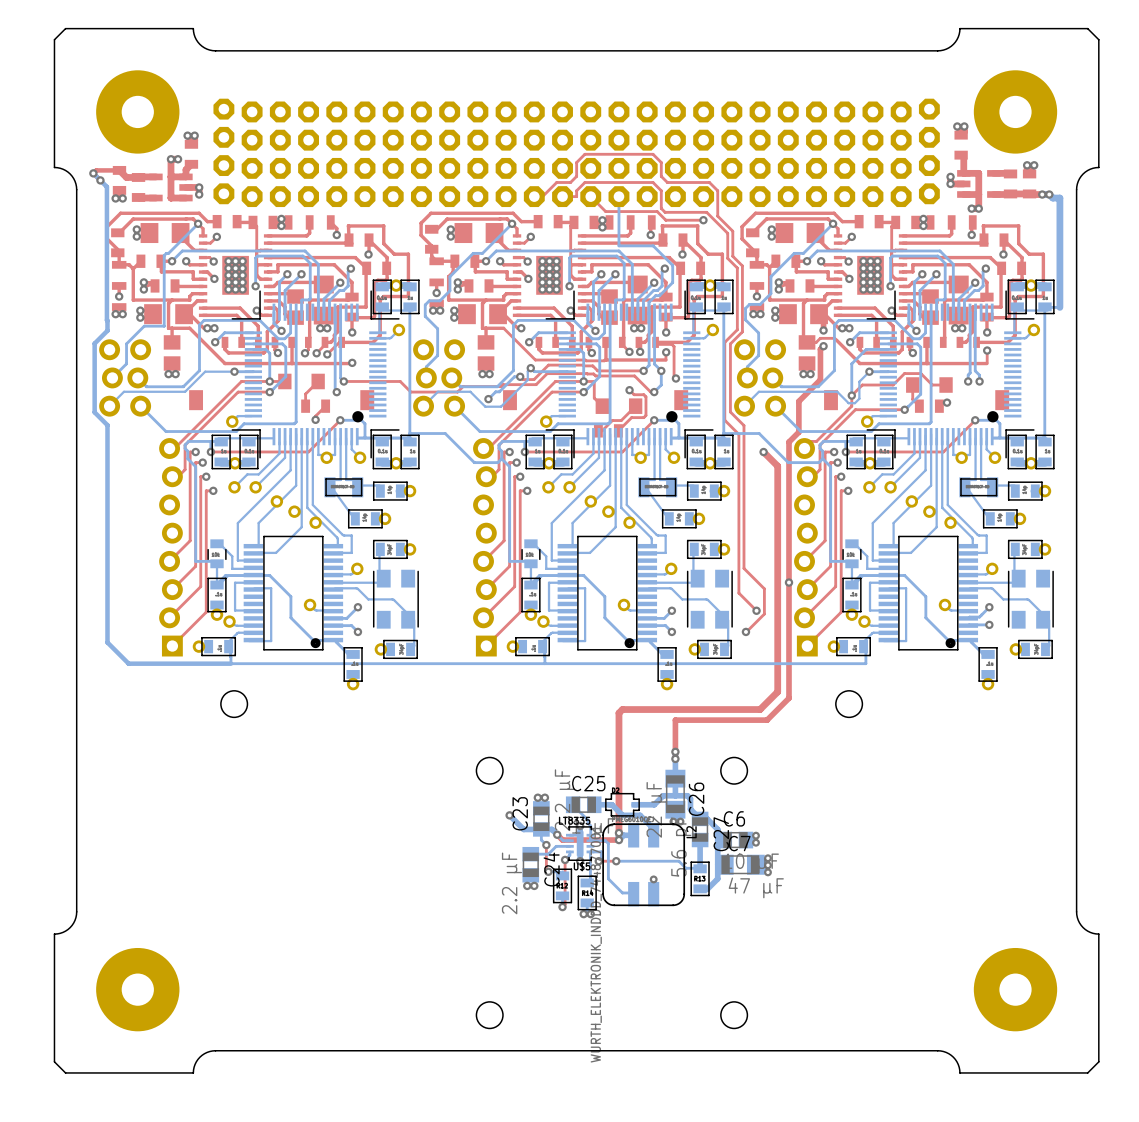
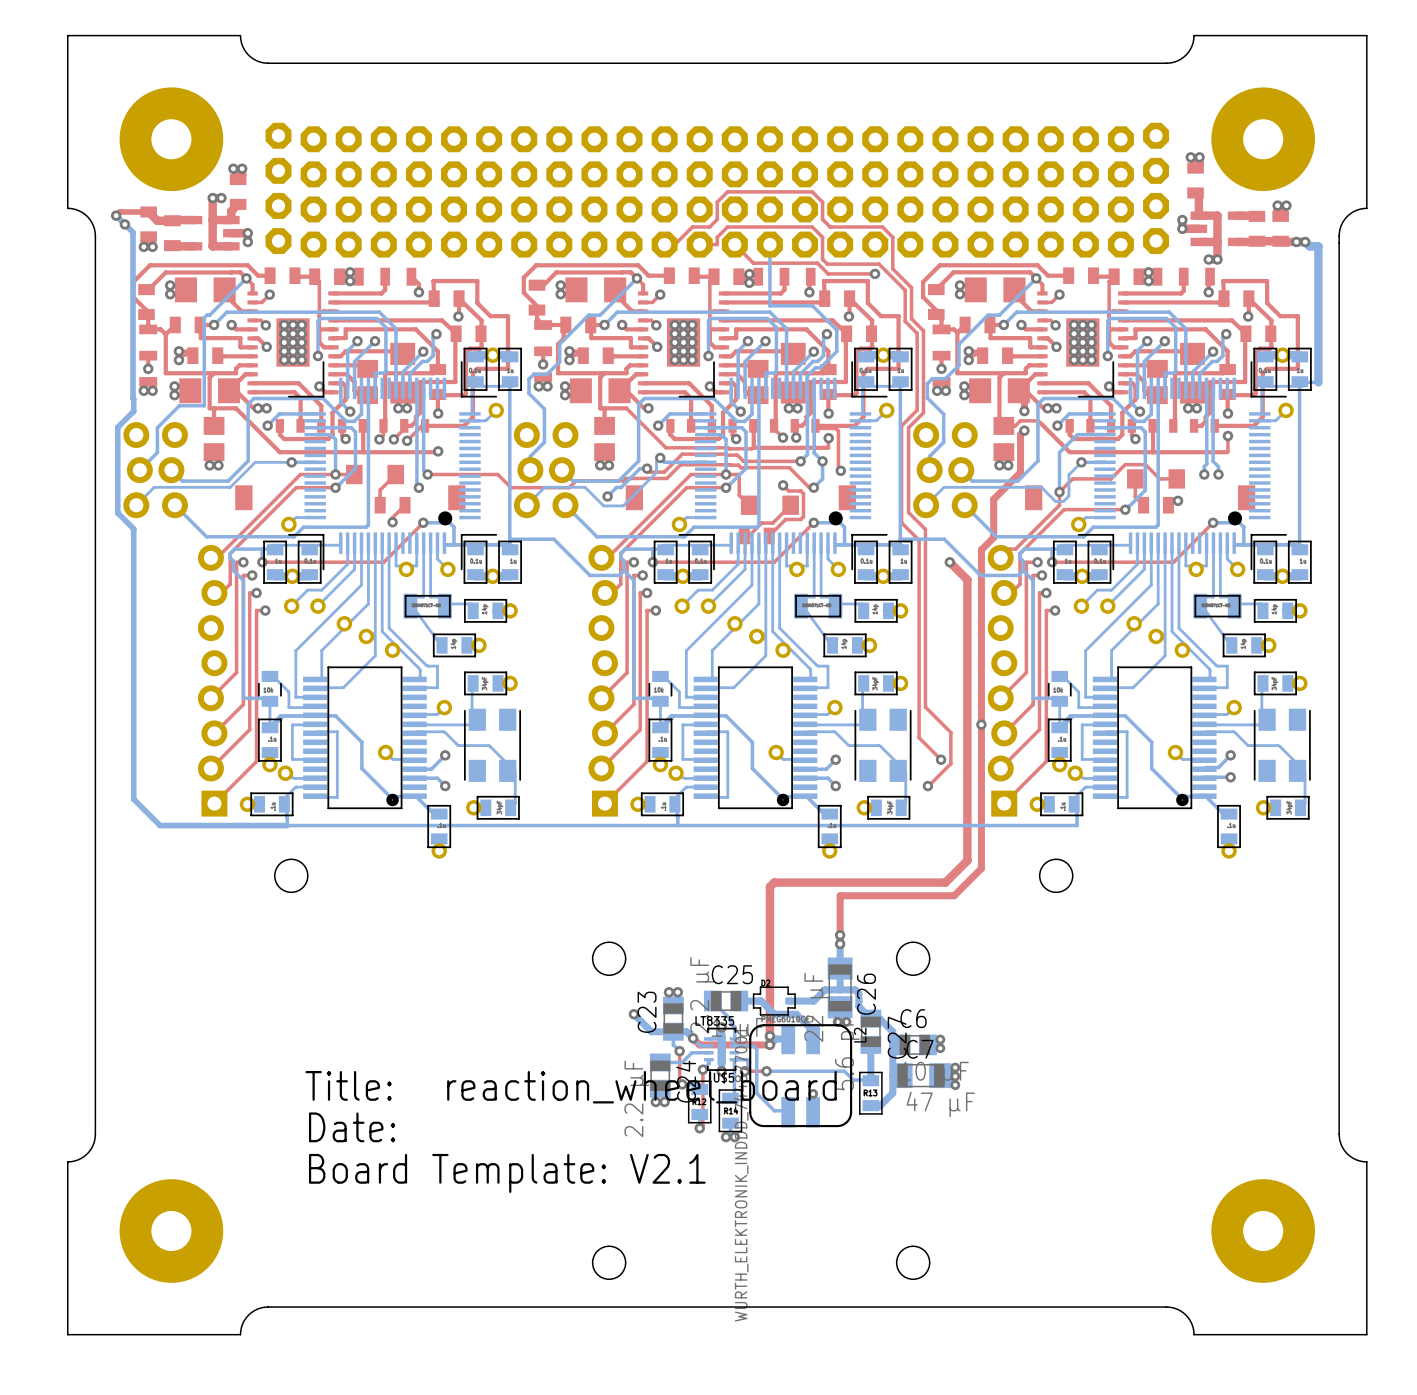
part footprint: [54, 28, 1099, 1073] -> [67, 35, 1367, 1335]
part text: none -> reaction_wheel_board (641, 1087)

